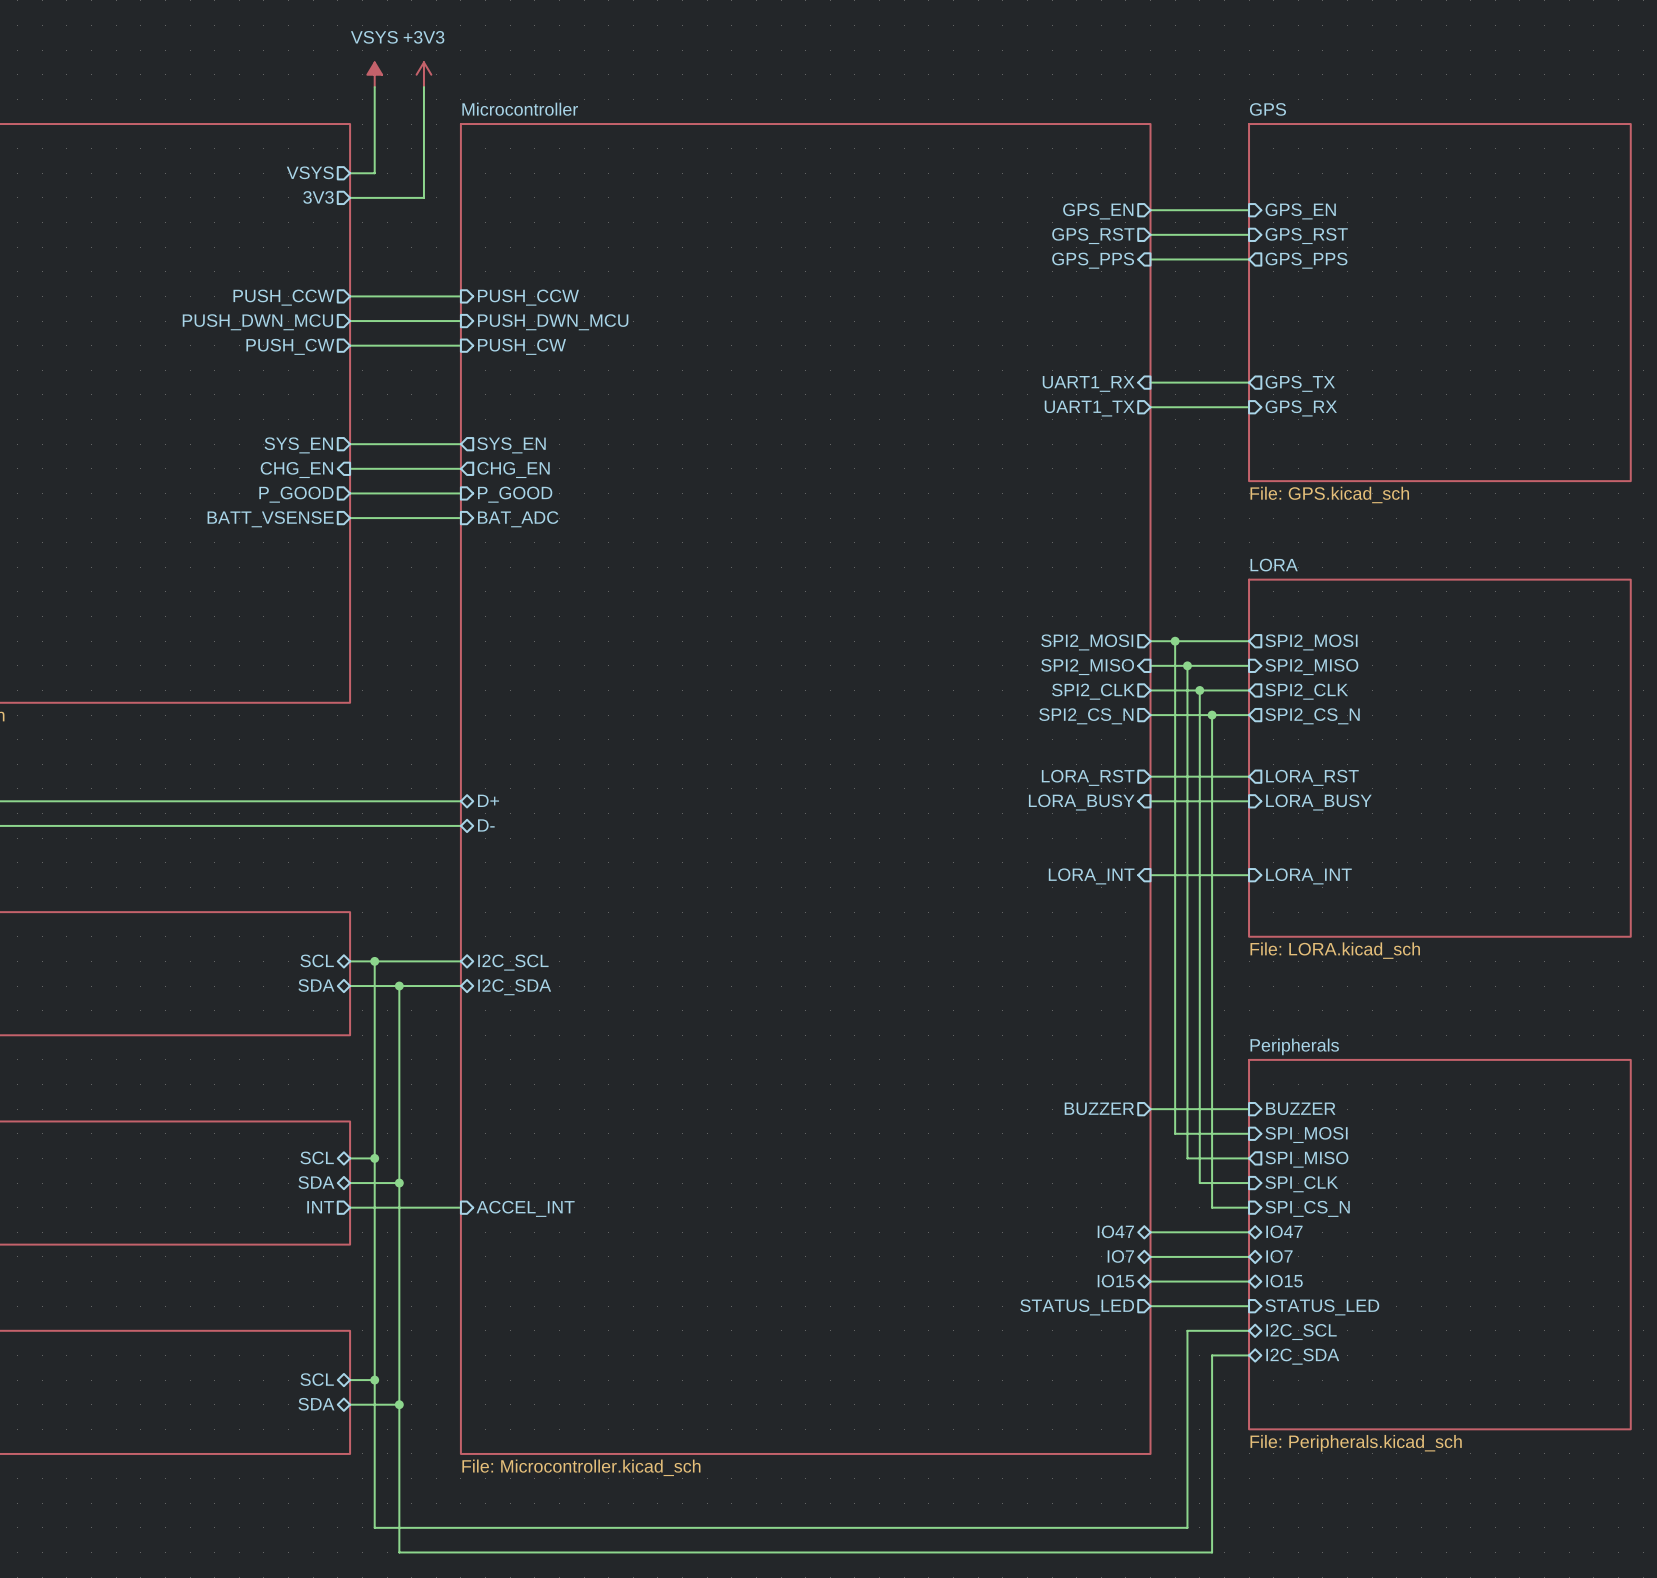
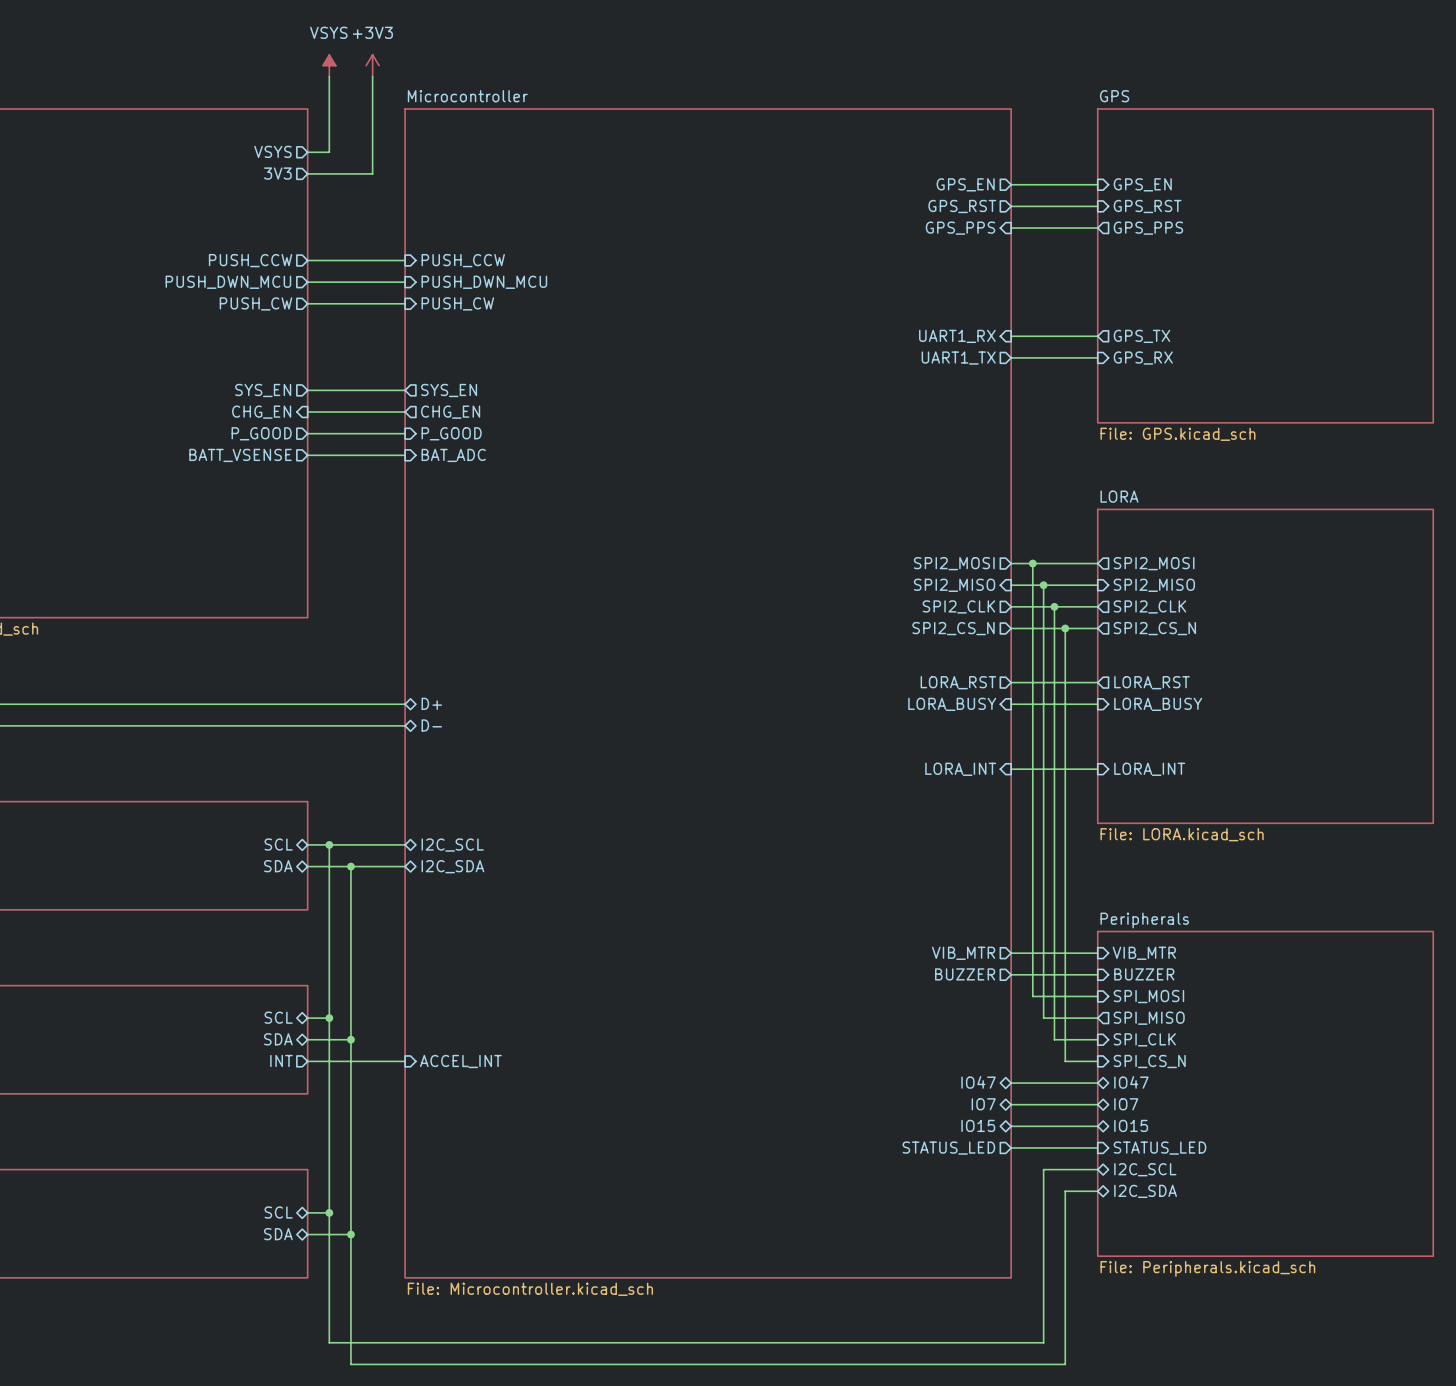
wire: none -> (1011, 953) (1097, 953)
sheet pin: none -> VIB_MTR (963, 953)
sheet pin: none -> VIB_MTR (1144, 953)

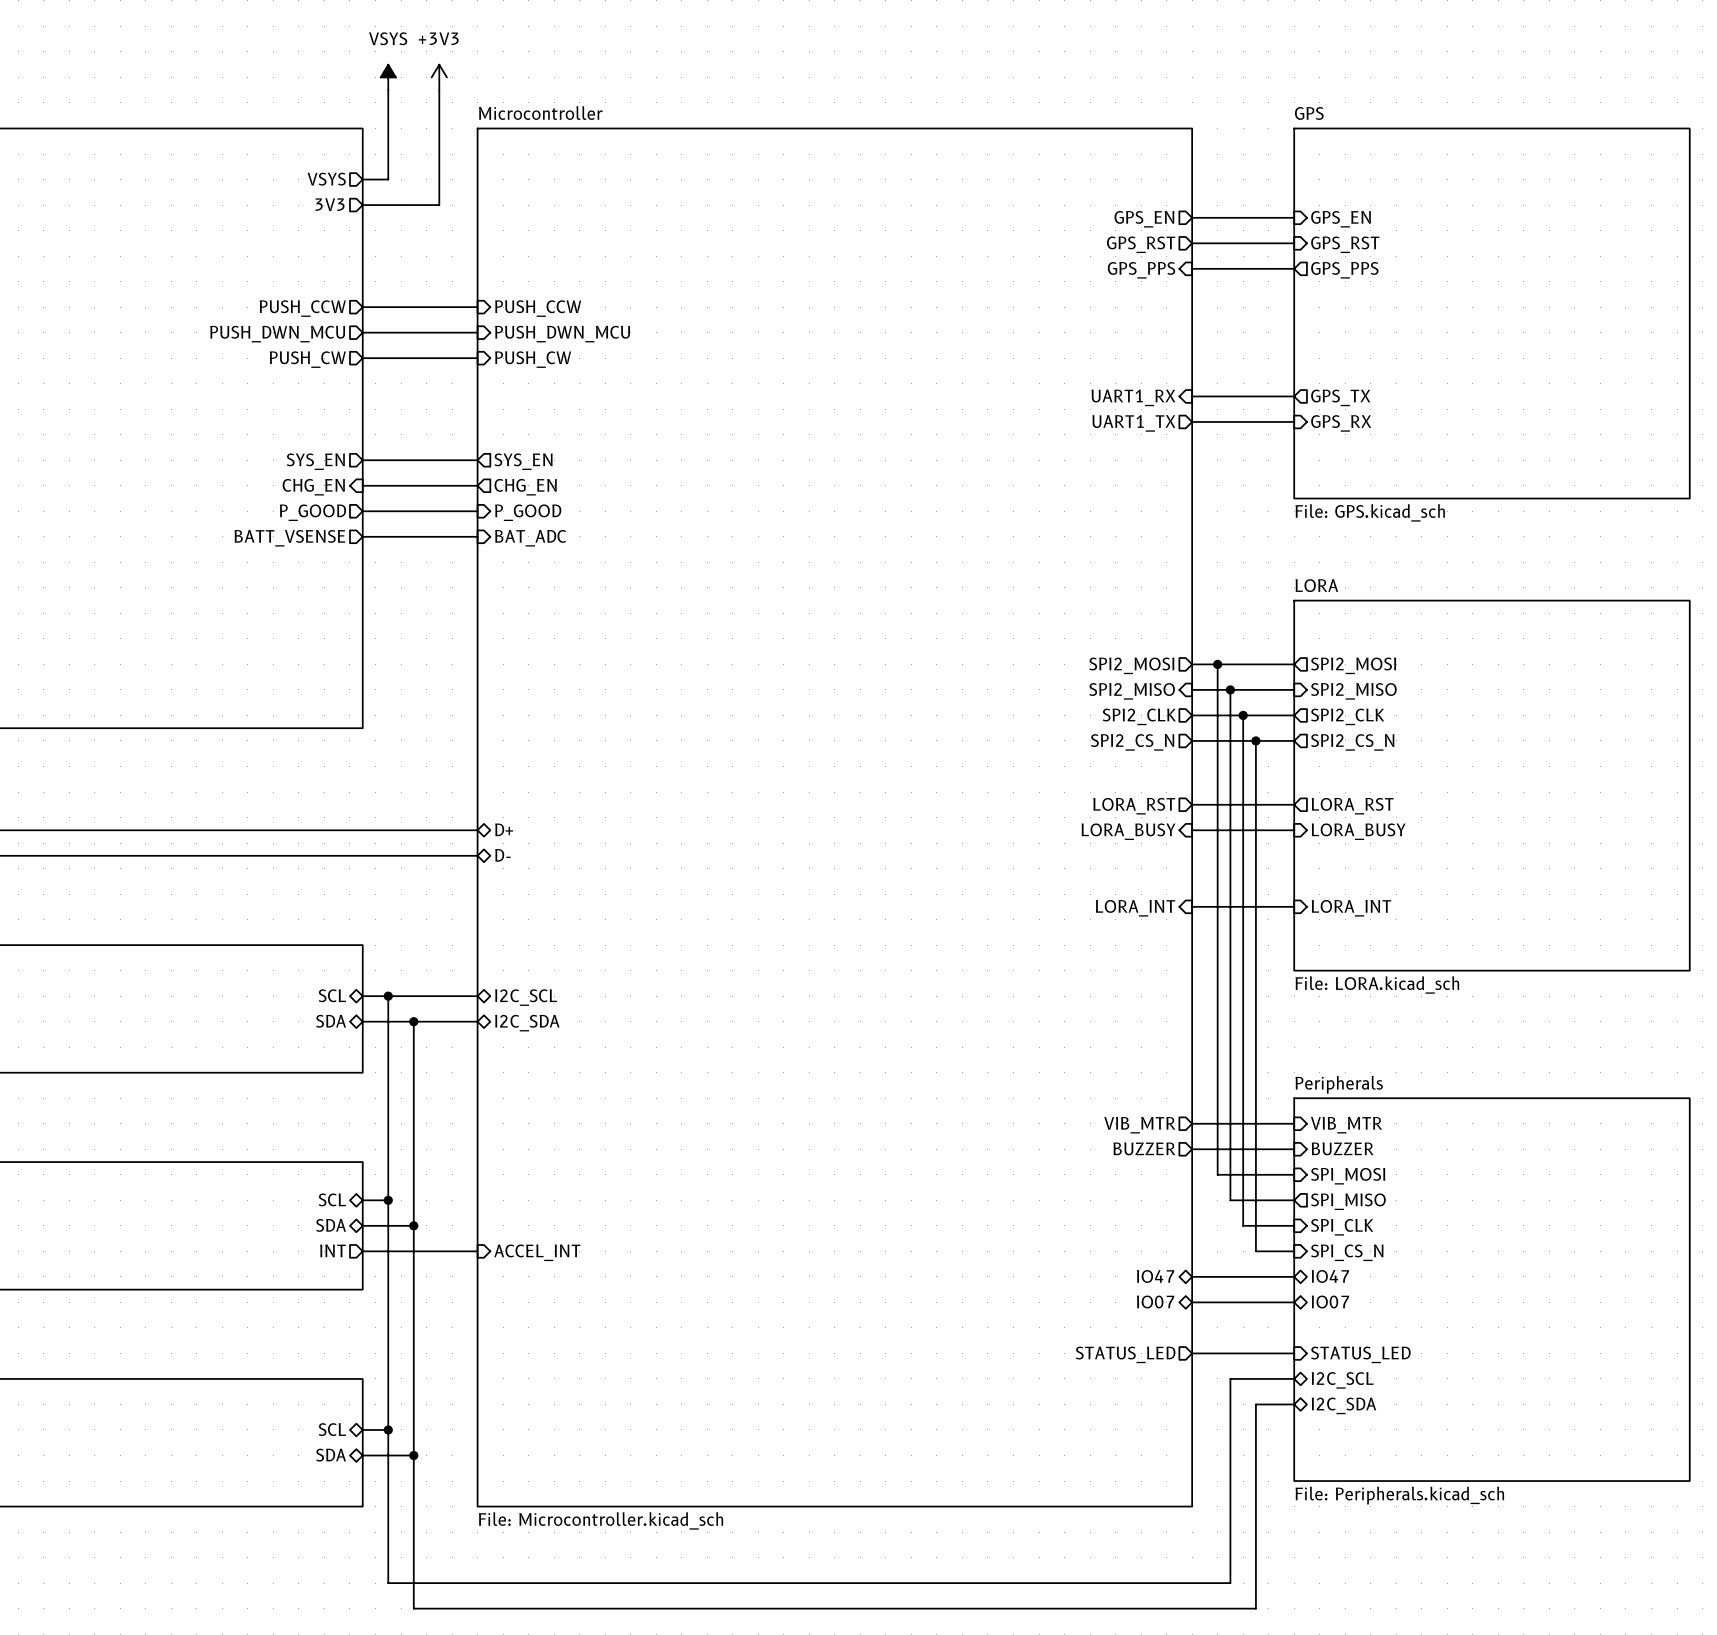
sheet pin: IO7 (983, 1104) -> IO07 (1155, 1301)
sheet pin: IO7 (1126, 1104) -> IO07 (1330, 1301)
sheet pin: IO15 (978, 1125) -> none
sheet pin: IO15 (1131, 1125) -> none
wire: (1011, 1126) (1097, 1126) -> none

